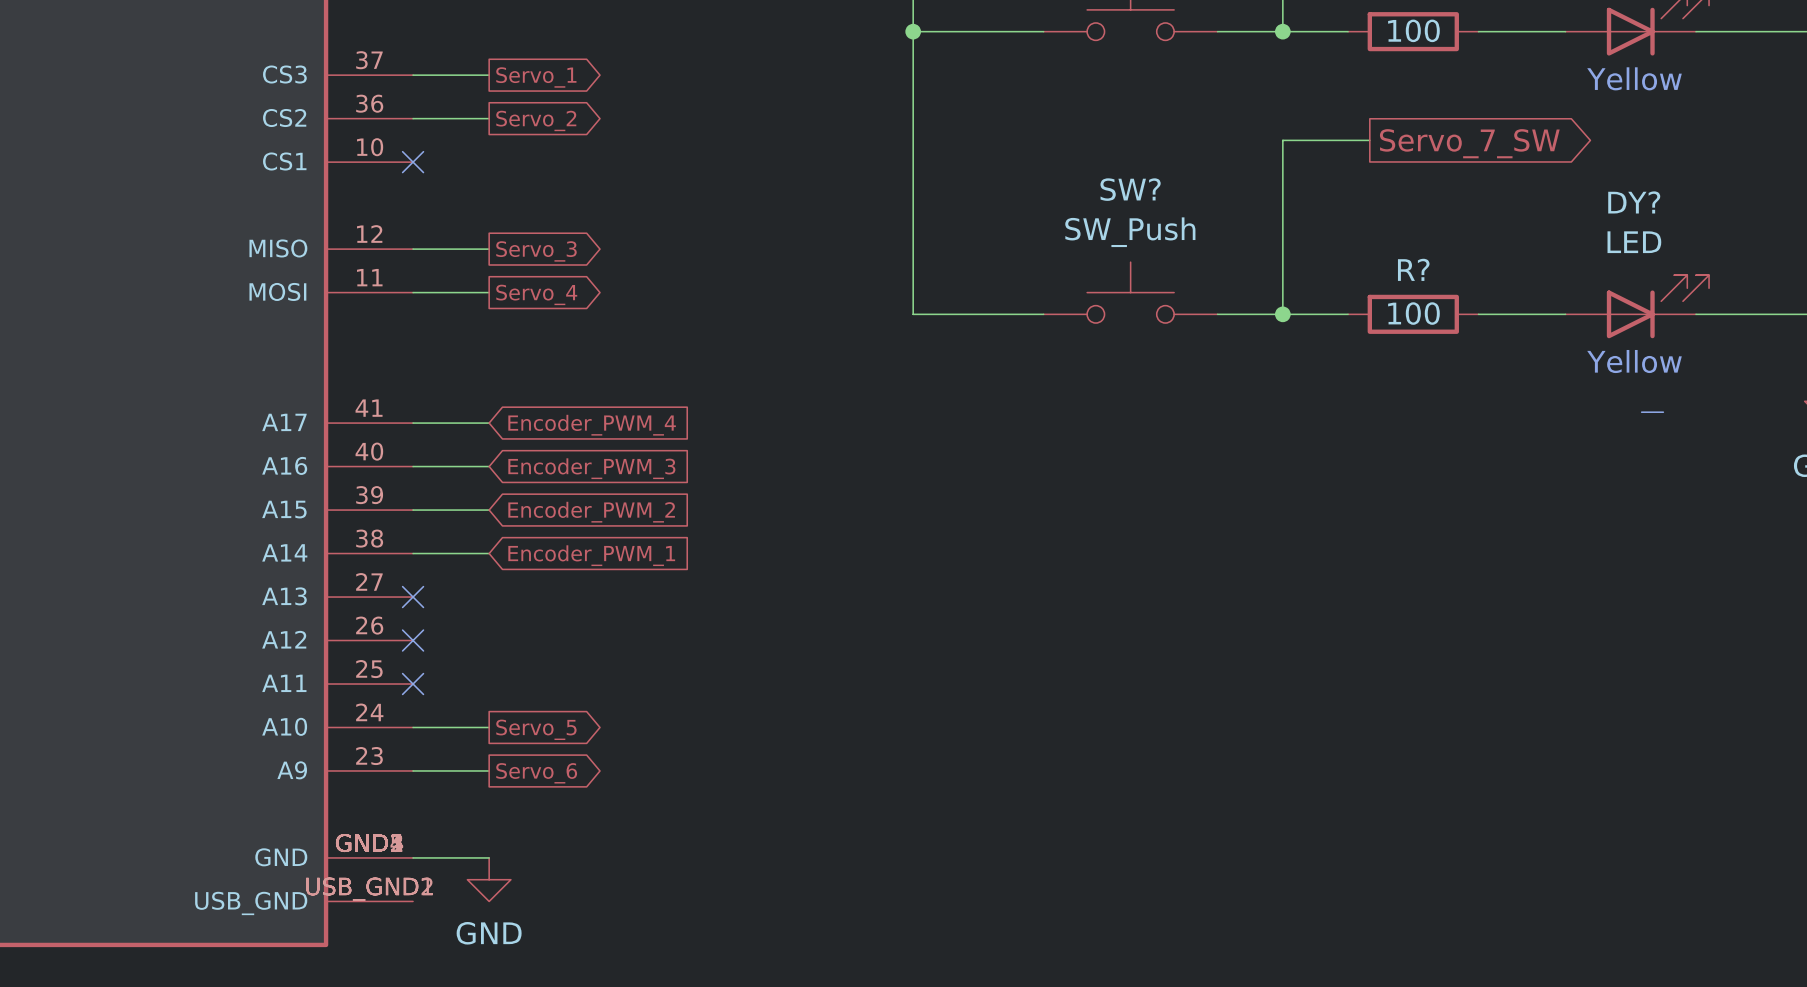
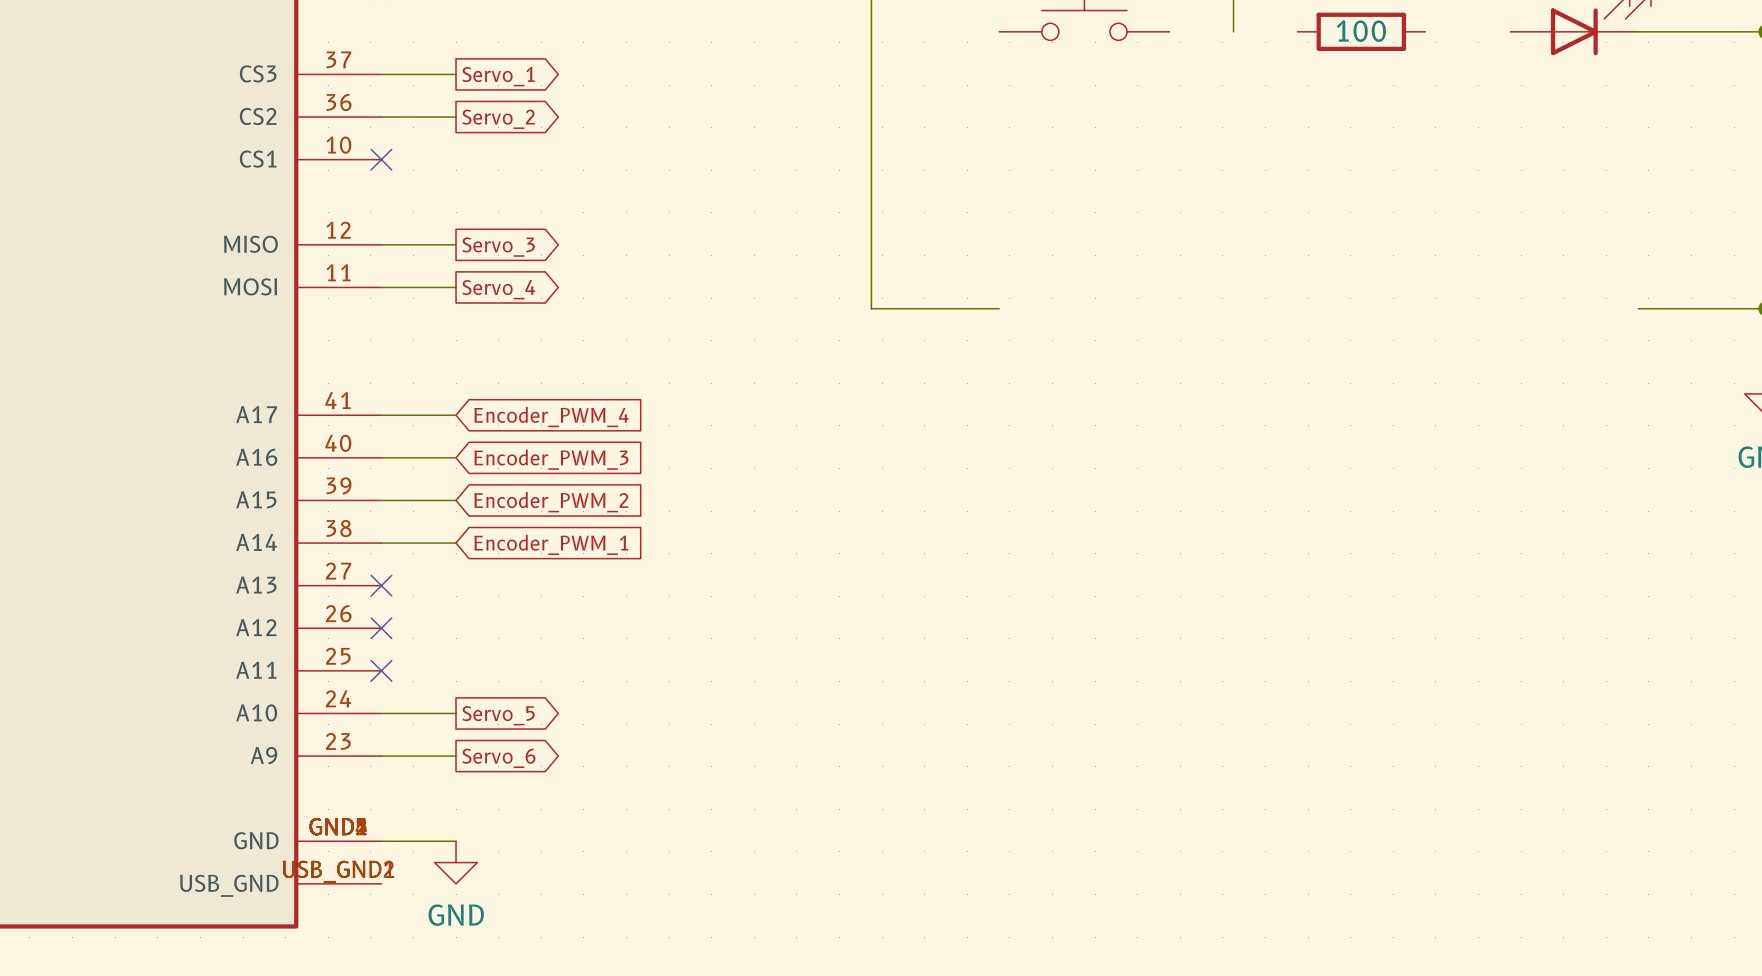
wire: (913, 31) (1043, 31) -> none
junction: (913, 31) -> none
wire: (1217, 31) (1348, 31) -> none
junction: (1282, 31) -> none
wire: (1478, 31) (1565, 31) -> none
text: Yellow (1634, 78) -> none
wire: (1369, 140) (1282, 140) (1282, 314) -> none
global label: Servo_7_SW (1469, 143) -> none
SW?: SW_Push (1130, 292) -> none
DY?: LED (1637, 306) -> none
wire: (1217, 314) (1348, 314) -> none
junction: (1282, 314) -> none
R?: 100 (1413, 314) -> none
wire: (1478, 314) (1565, 314) -> none
text: Yellow (1634, 361) -> none
line: (1641, 412) (1663, 412) -> none

